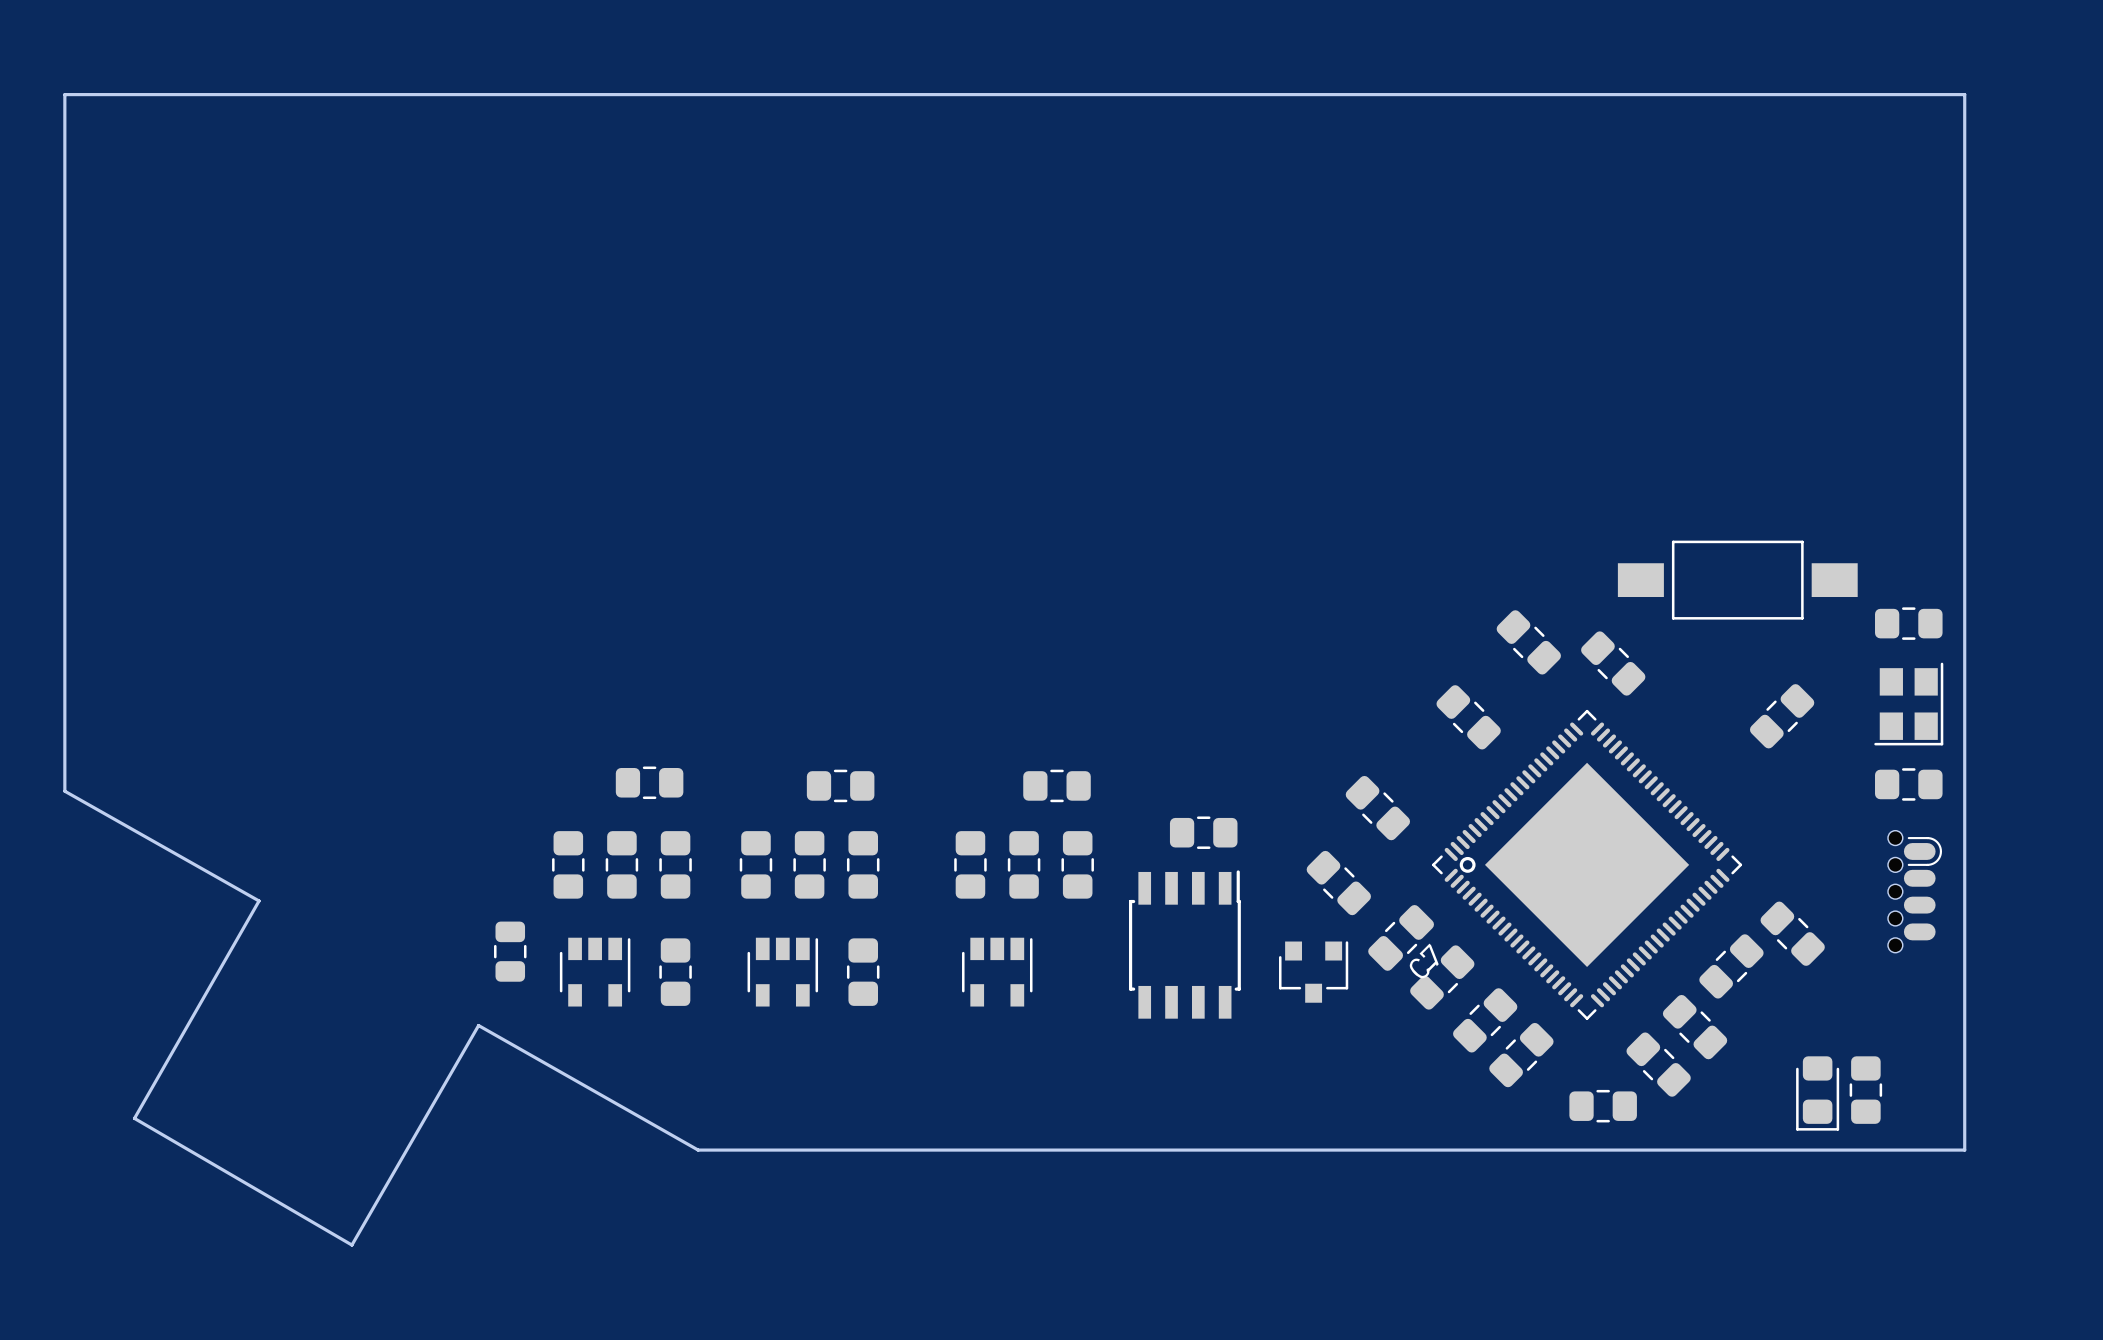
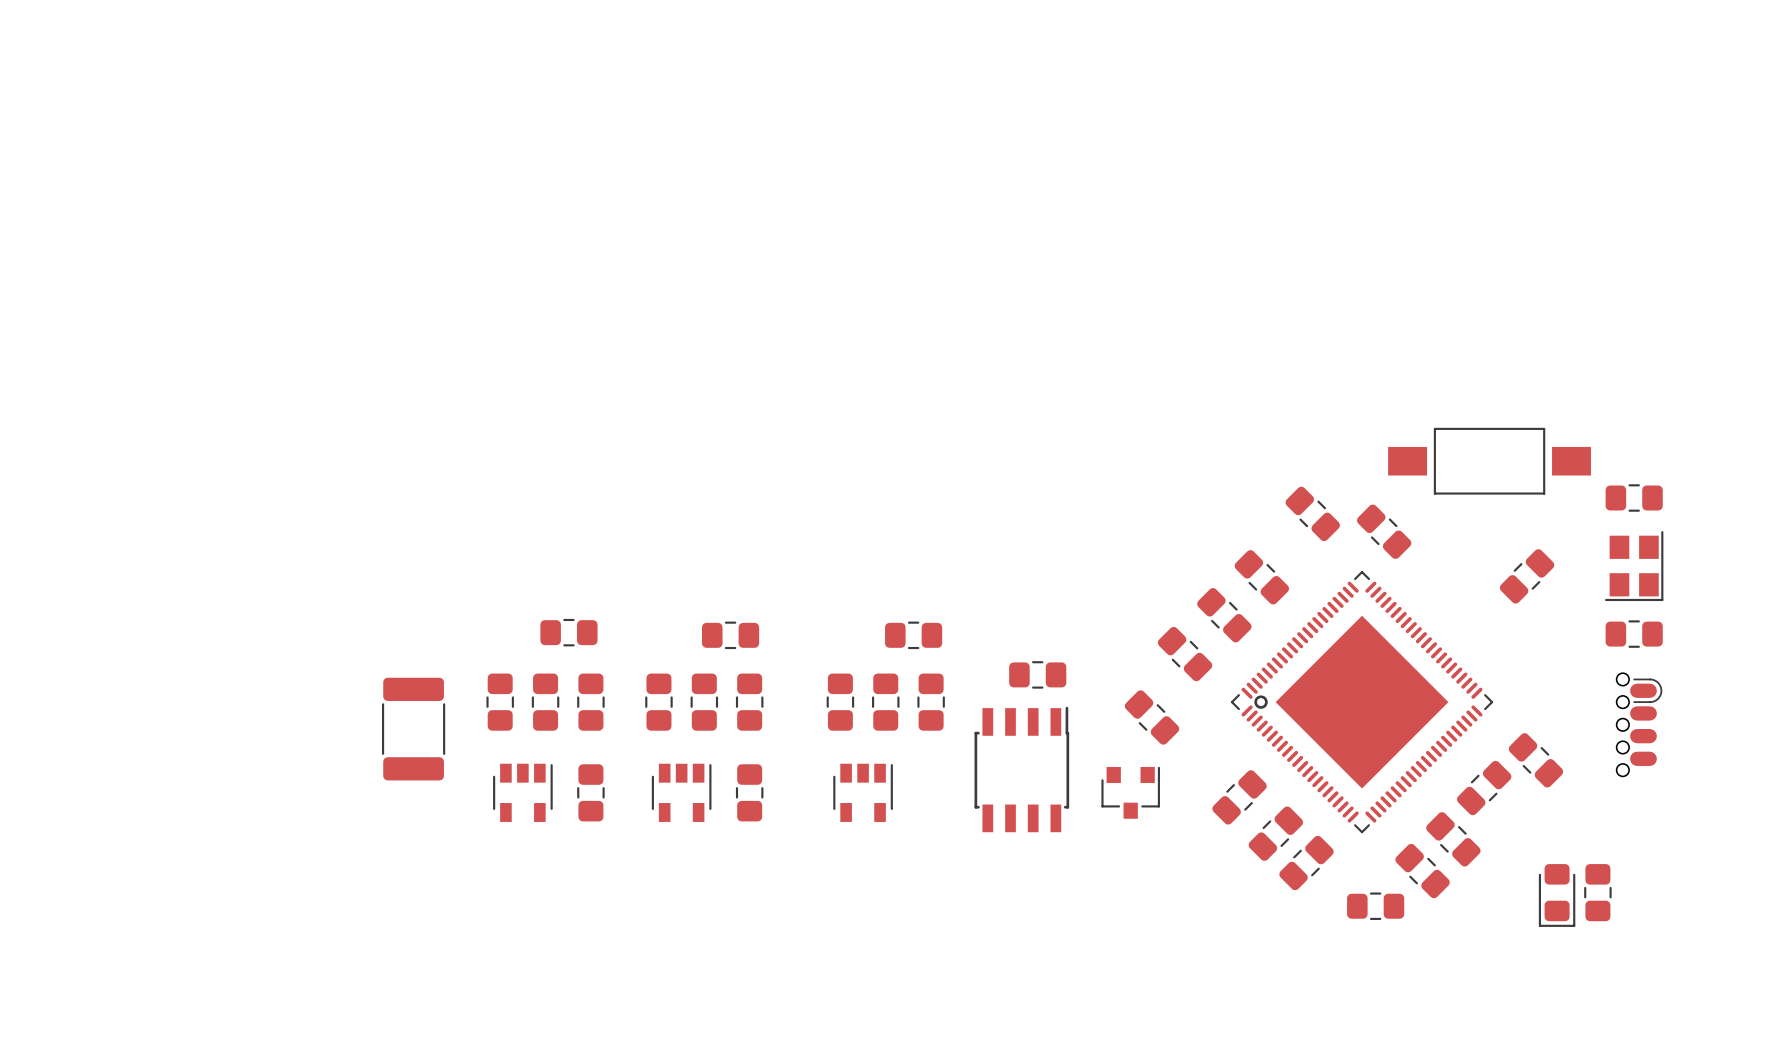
board edge: (64, 94) (1964, 94) (1964, 1150) (698, 1150) (478, 1025) (351, 1245) (134, 1118) (259, 900) (64, 791) (64, 94) -> none
part: none -> (1224, 615)
part: none -> (413, 729)
C7: (1401, 937) -> none
part: (510, 951) -> none

